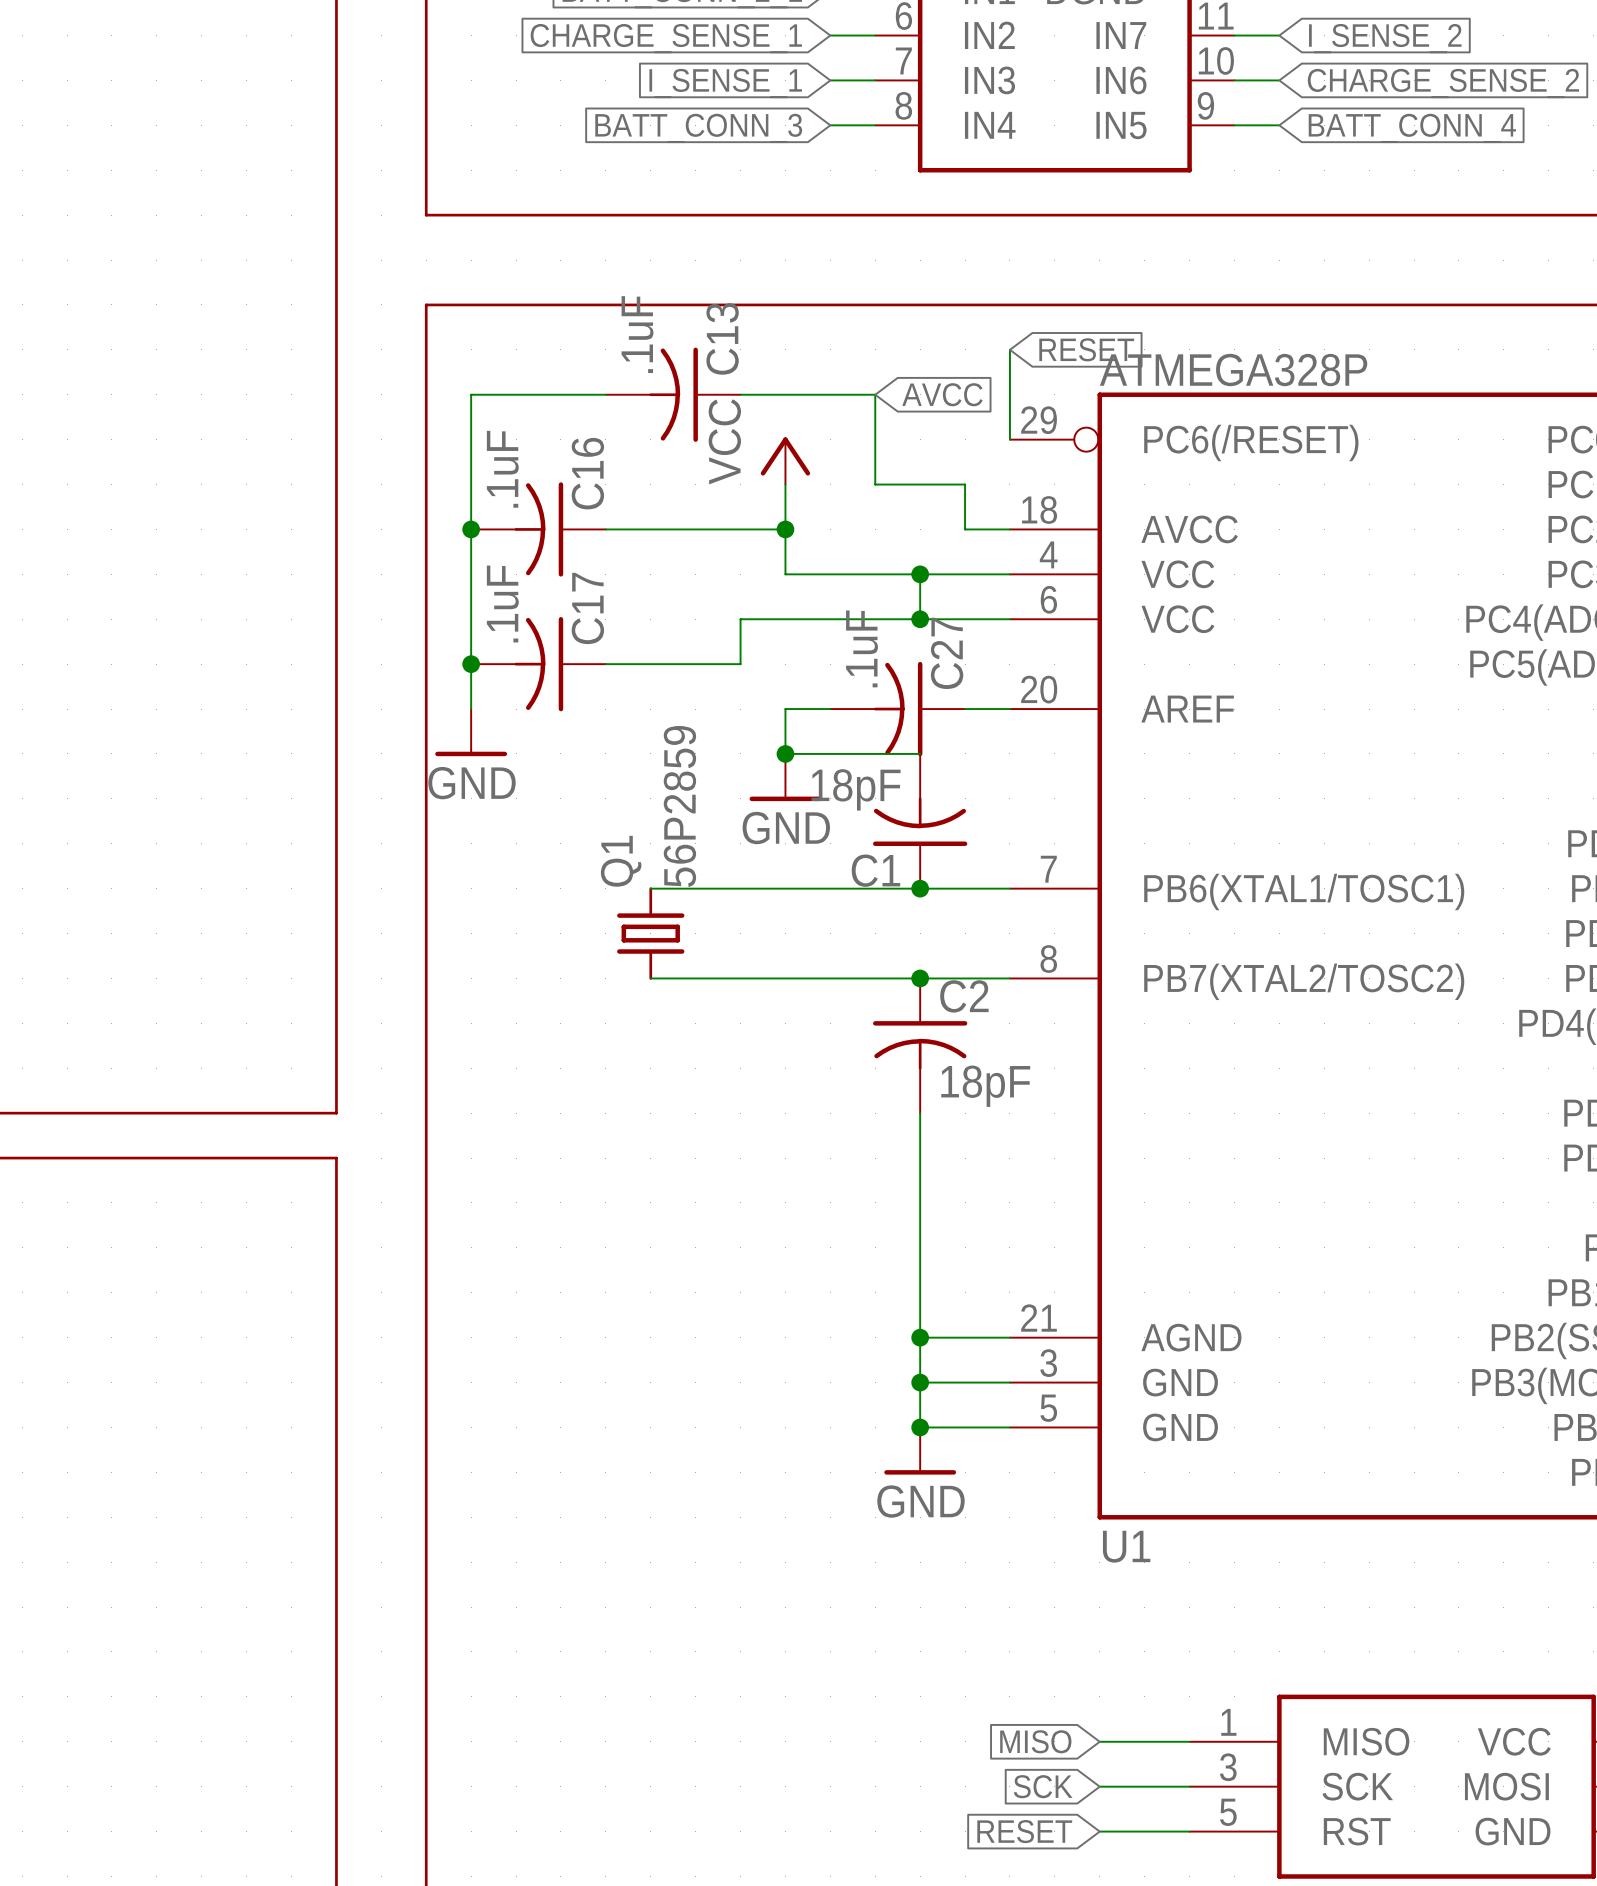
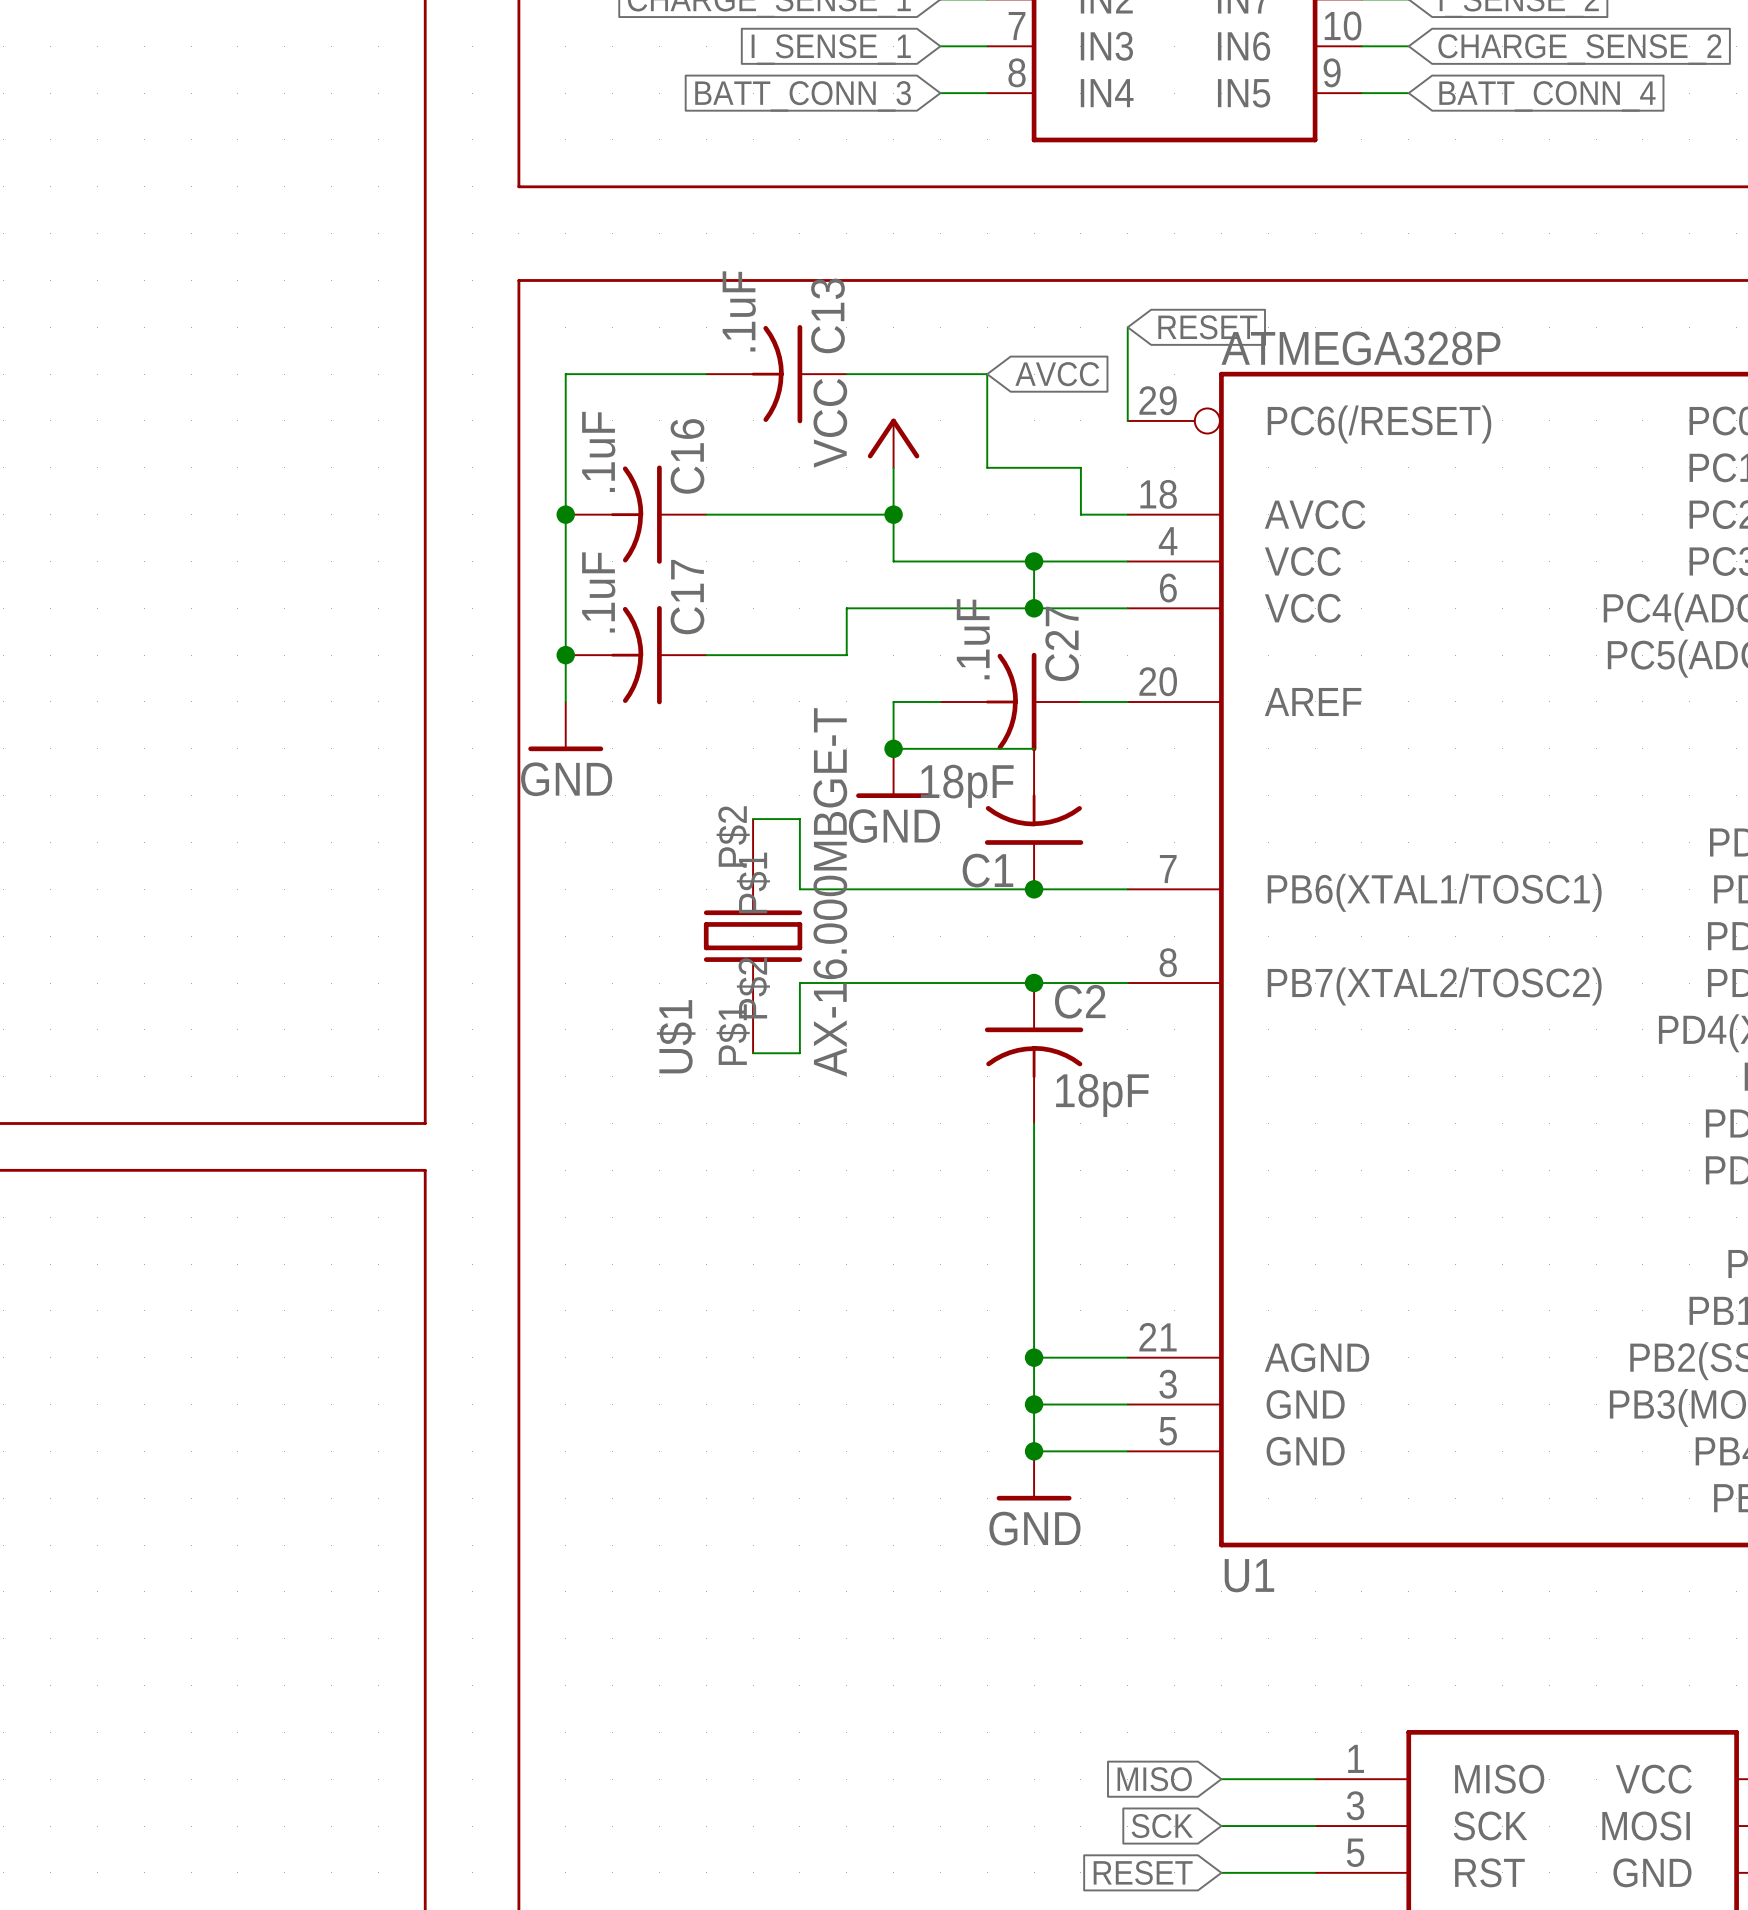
wire: (650, 888) (695, 888) -> (753, 819) (799, 819) (799, 889)
Q1: 56P2859 (650, 933) -> none
U$1: none -> AX-16.000MBGE-T (753, 936)
wire: (650, 978) (695, 978) -> (753, 1053) (799, 1053) (799, 983)

